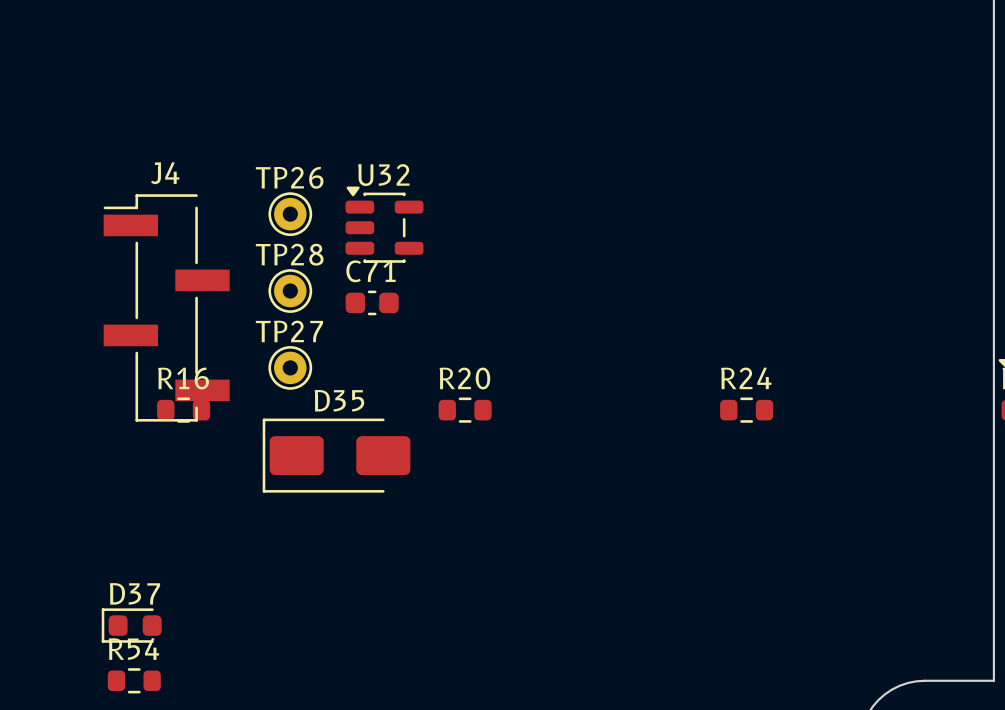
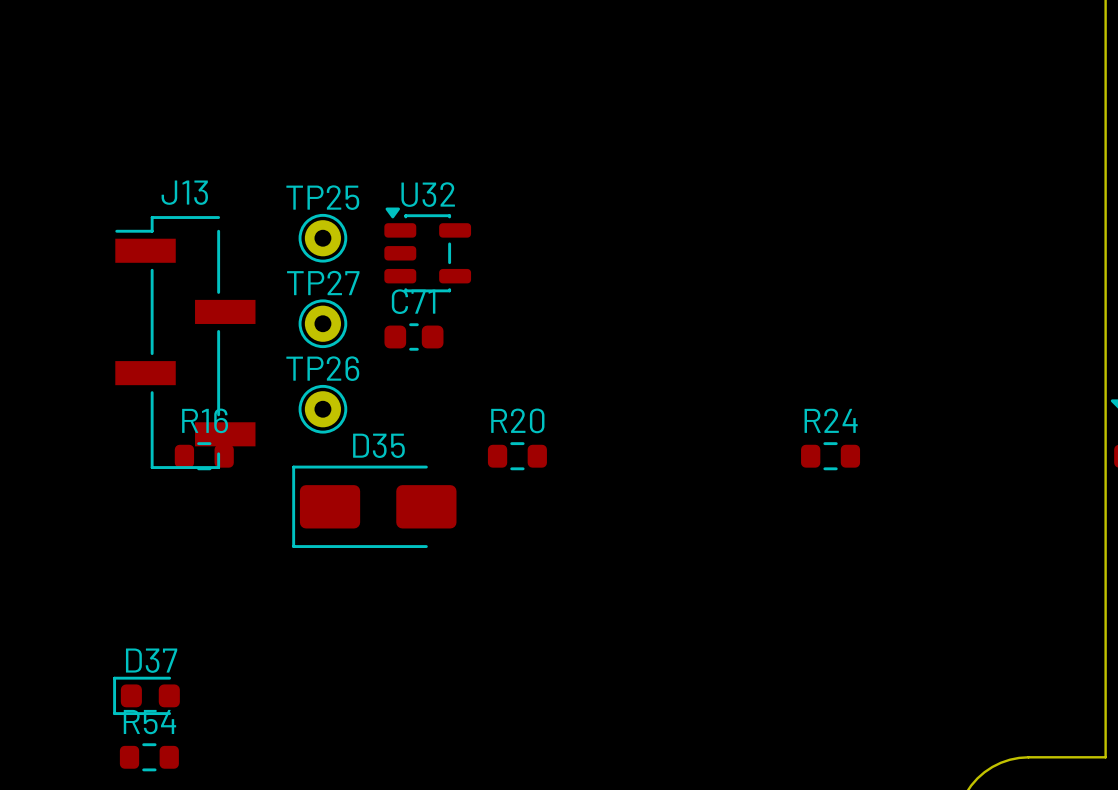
J4 name: J4 (165, 173) -> J13 (184, 192)
TP26 name: TP26 (289, 177) -> TP25 (322, 197)
TP28 name: TP28 (289, 254) -> TP27 (323, 283)
TP27 name: TP27 (289, 331) -> TP26 (322, 368)

